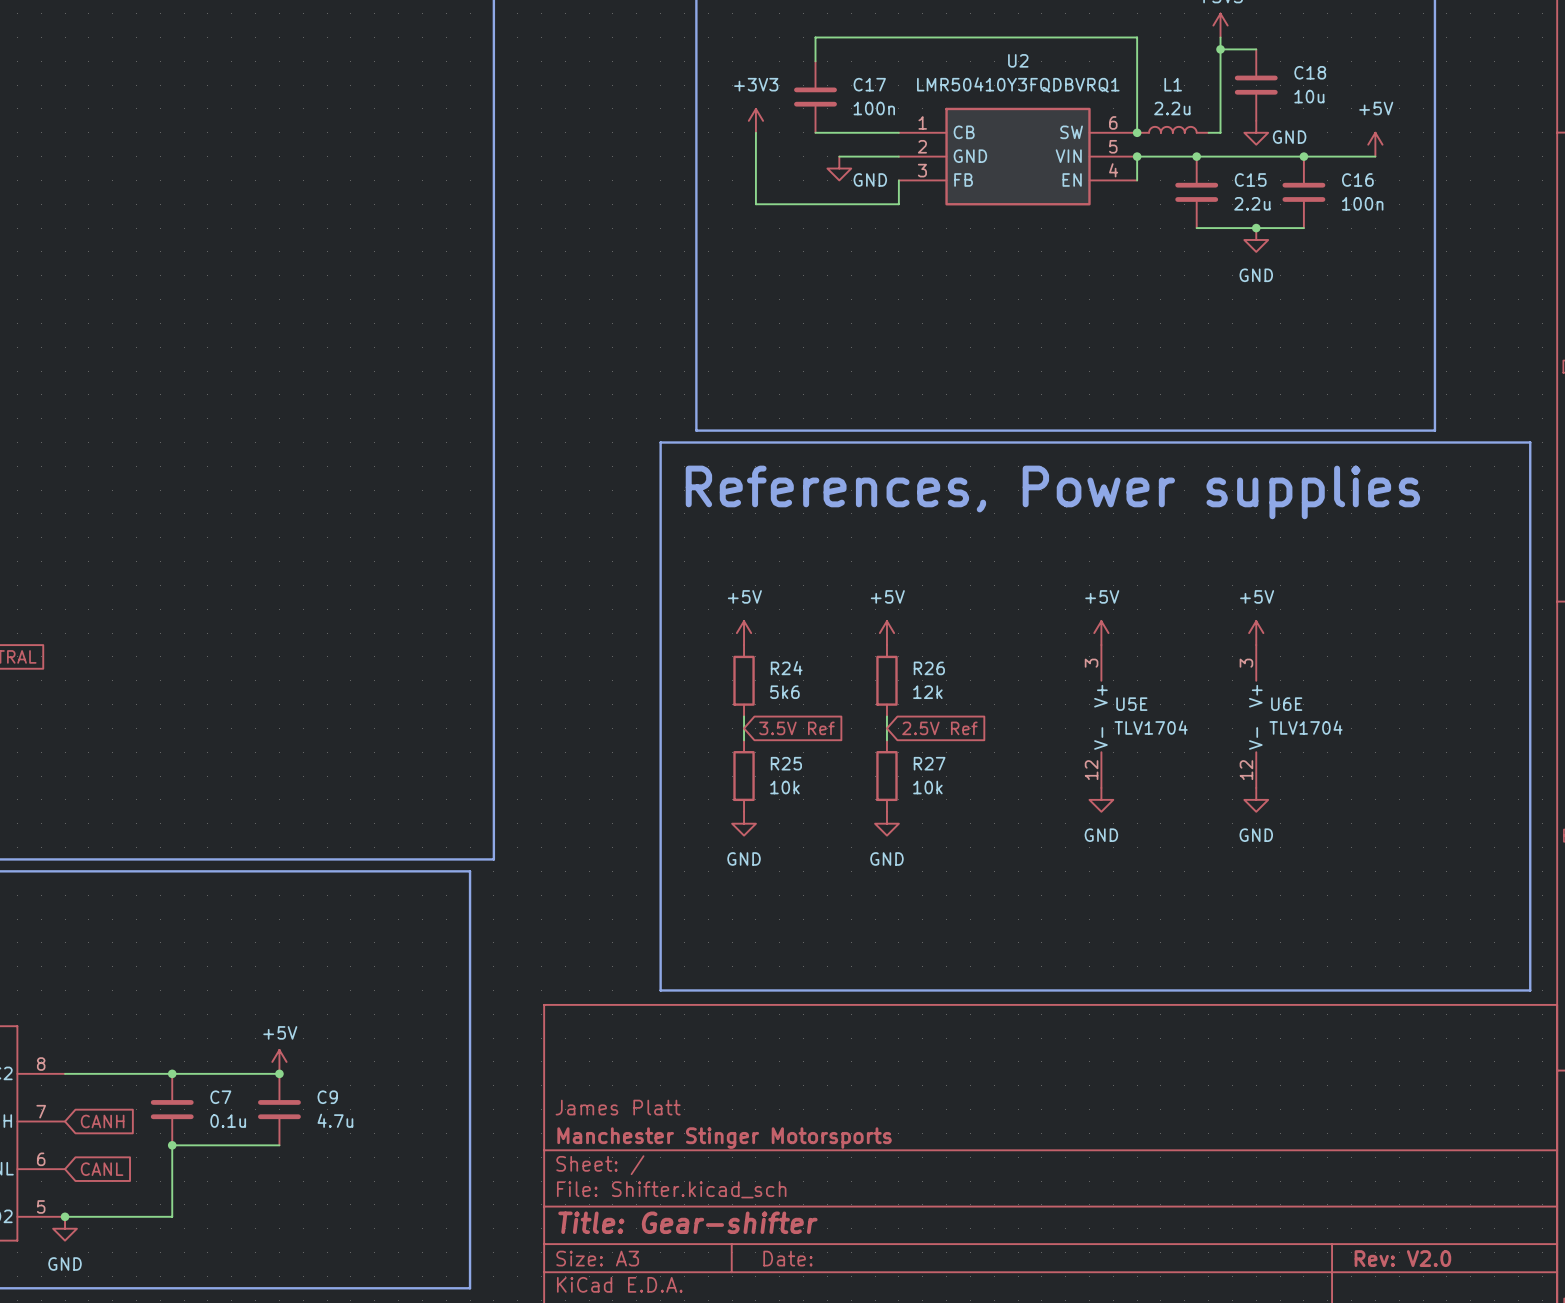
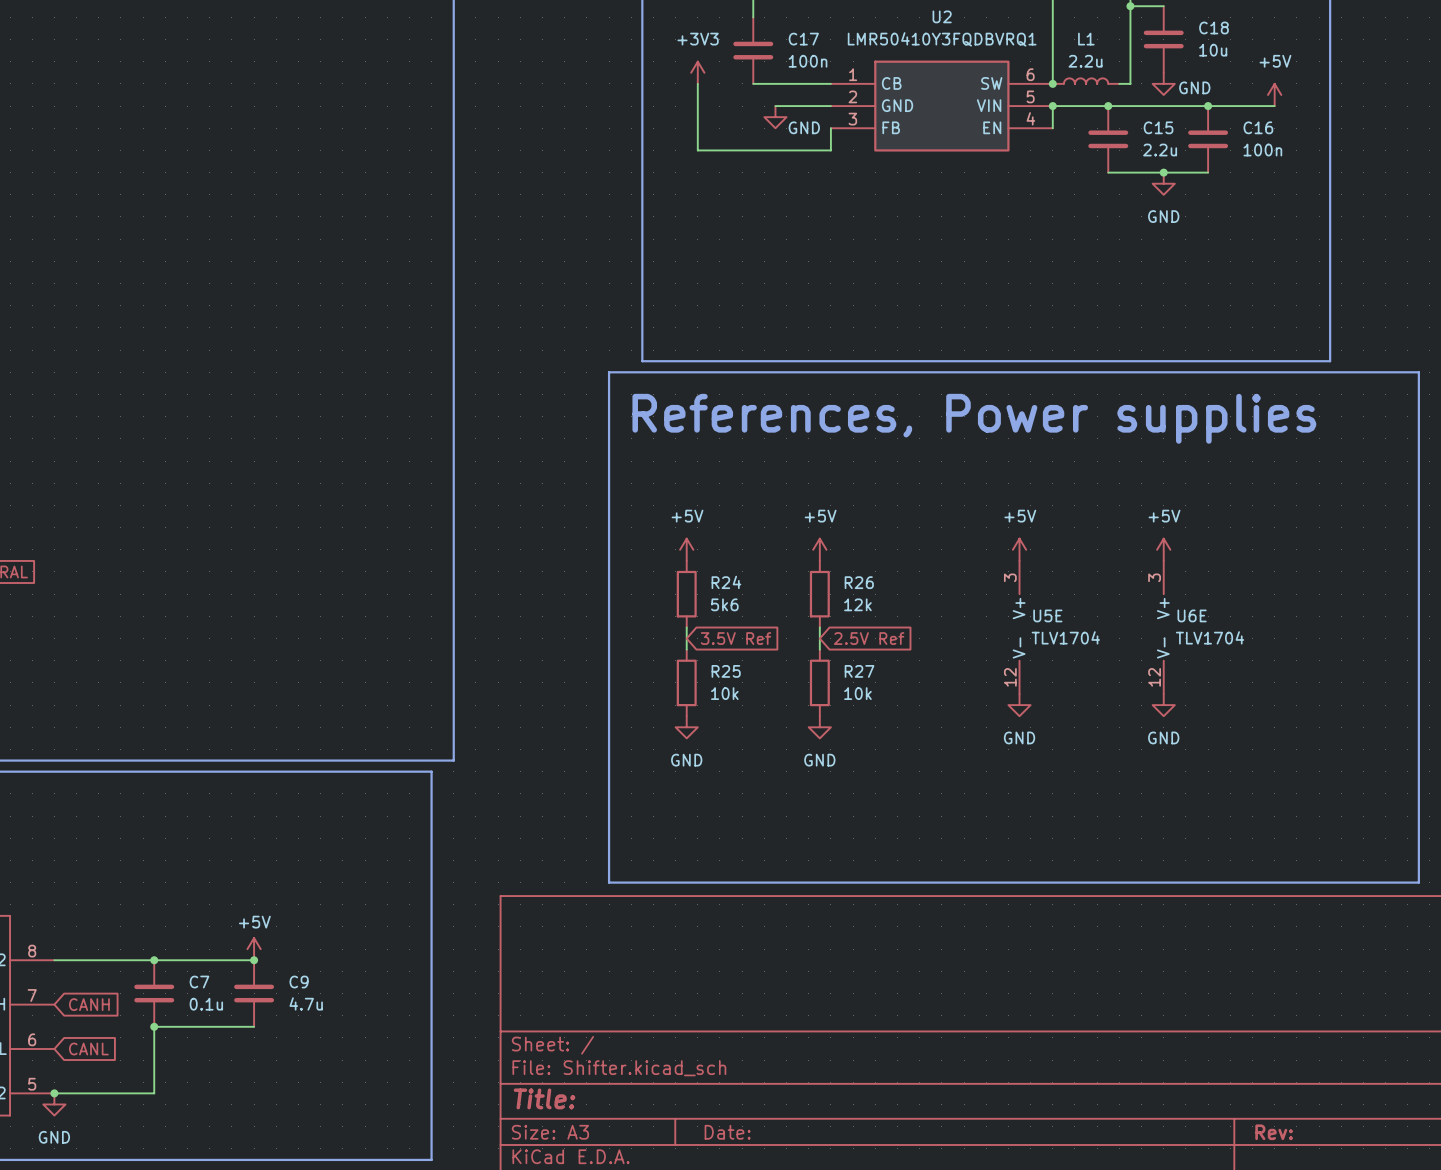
title block: James Platt (618, 1107) -> none
title block: Manchester Stinger Motorsports (724, 1138) -> none
title block: Title: Gear-shifter (687, 1222) -> Title: (544, 1098)
title block: Rev: V2.0 (1402, 1258) -> Rev: (1274, 1132)

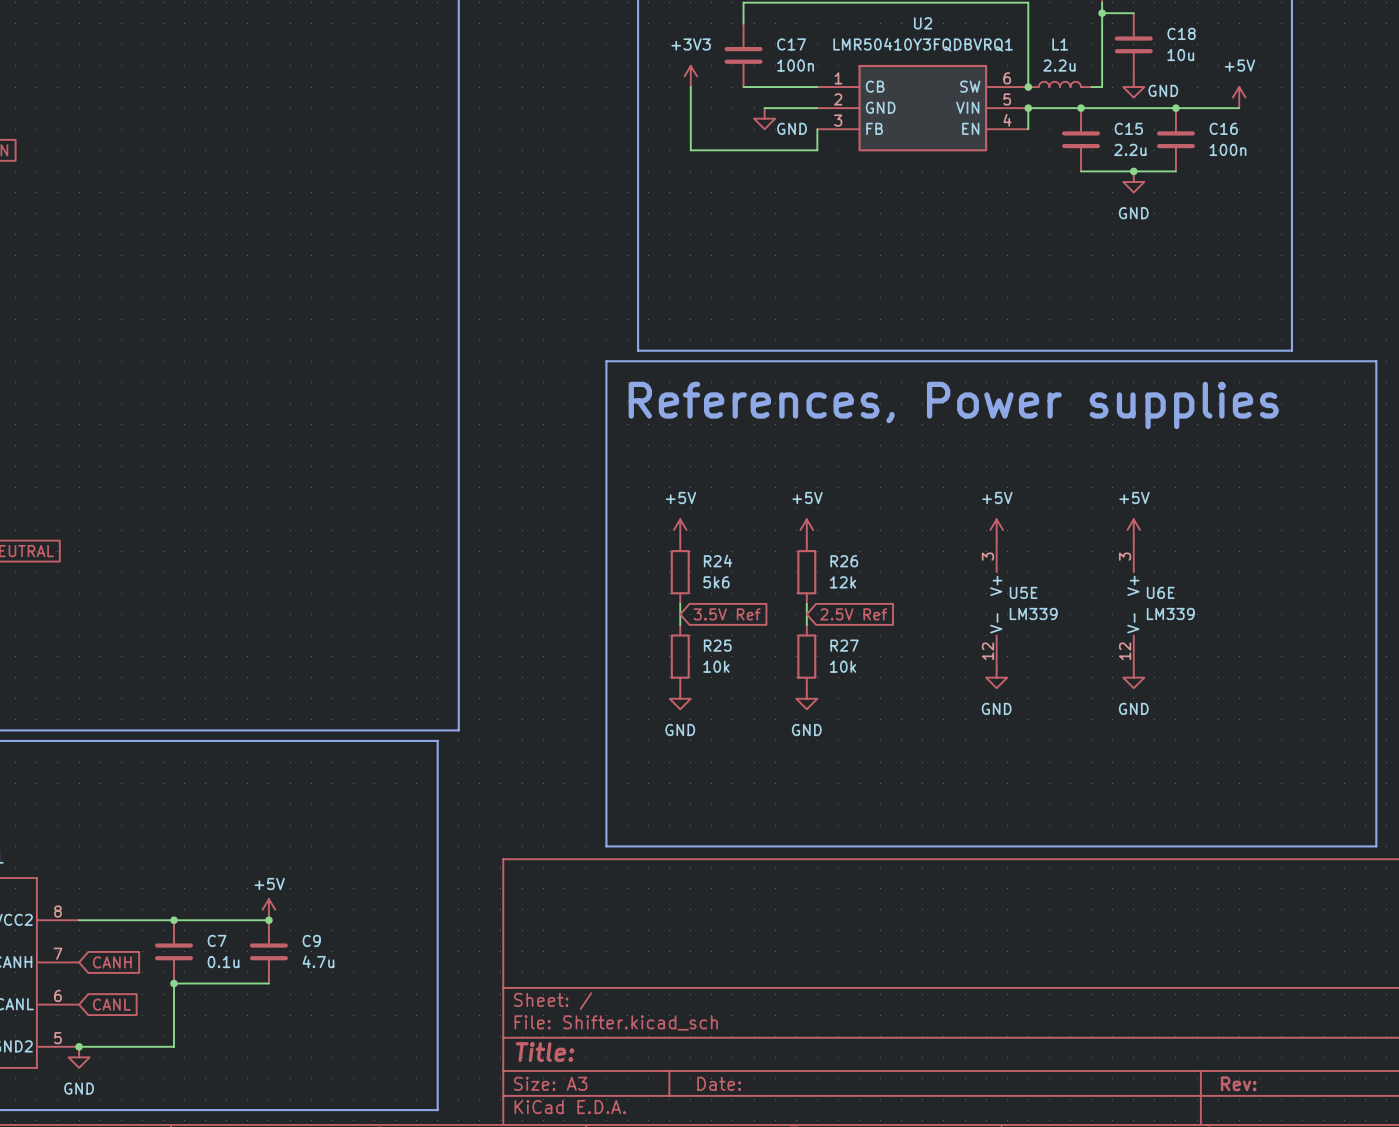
U5E value: TLV1704 (1065, 637) -> LM339 (1033, 613)
U6E value: TLV1704 (1210, 637) -> LM339 (1170, 613)

